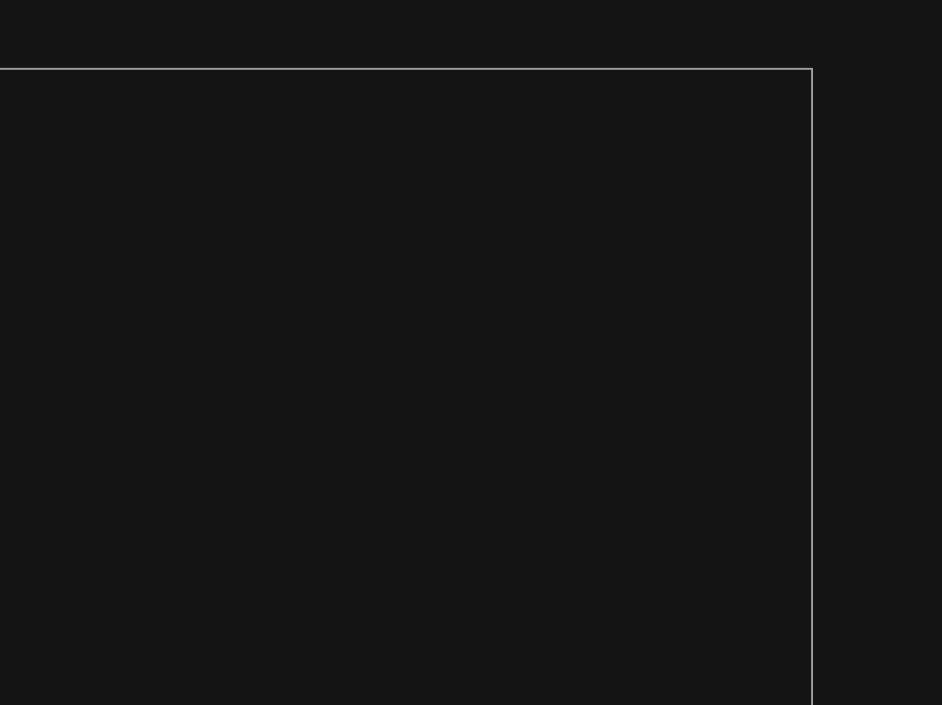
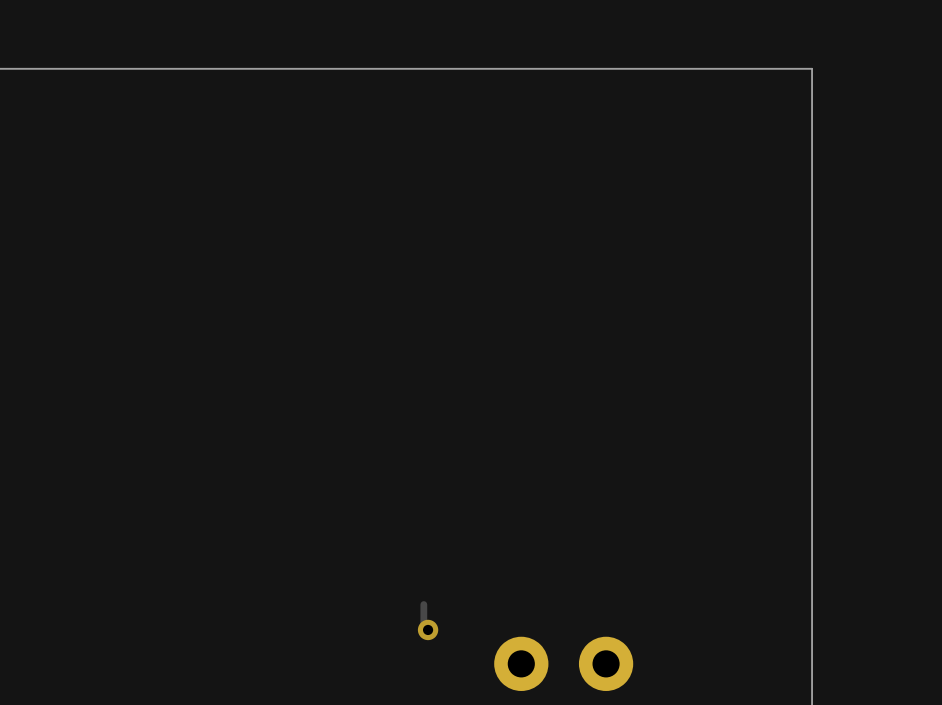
track: none -> (423, 604) (423, 625) (428, 629)
via: none -> (428, 629)
part: none -> (563, 663)

